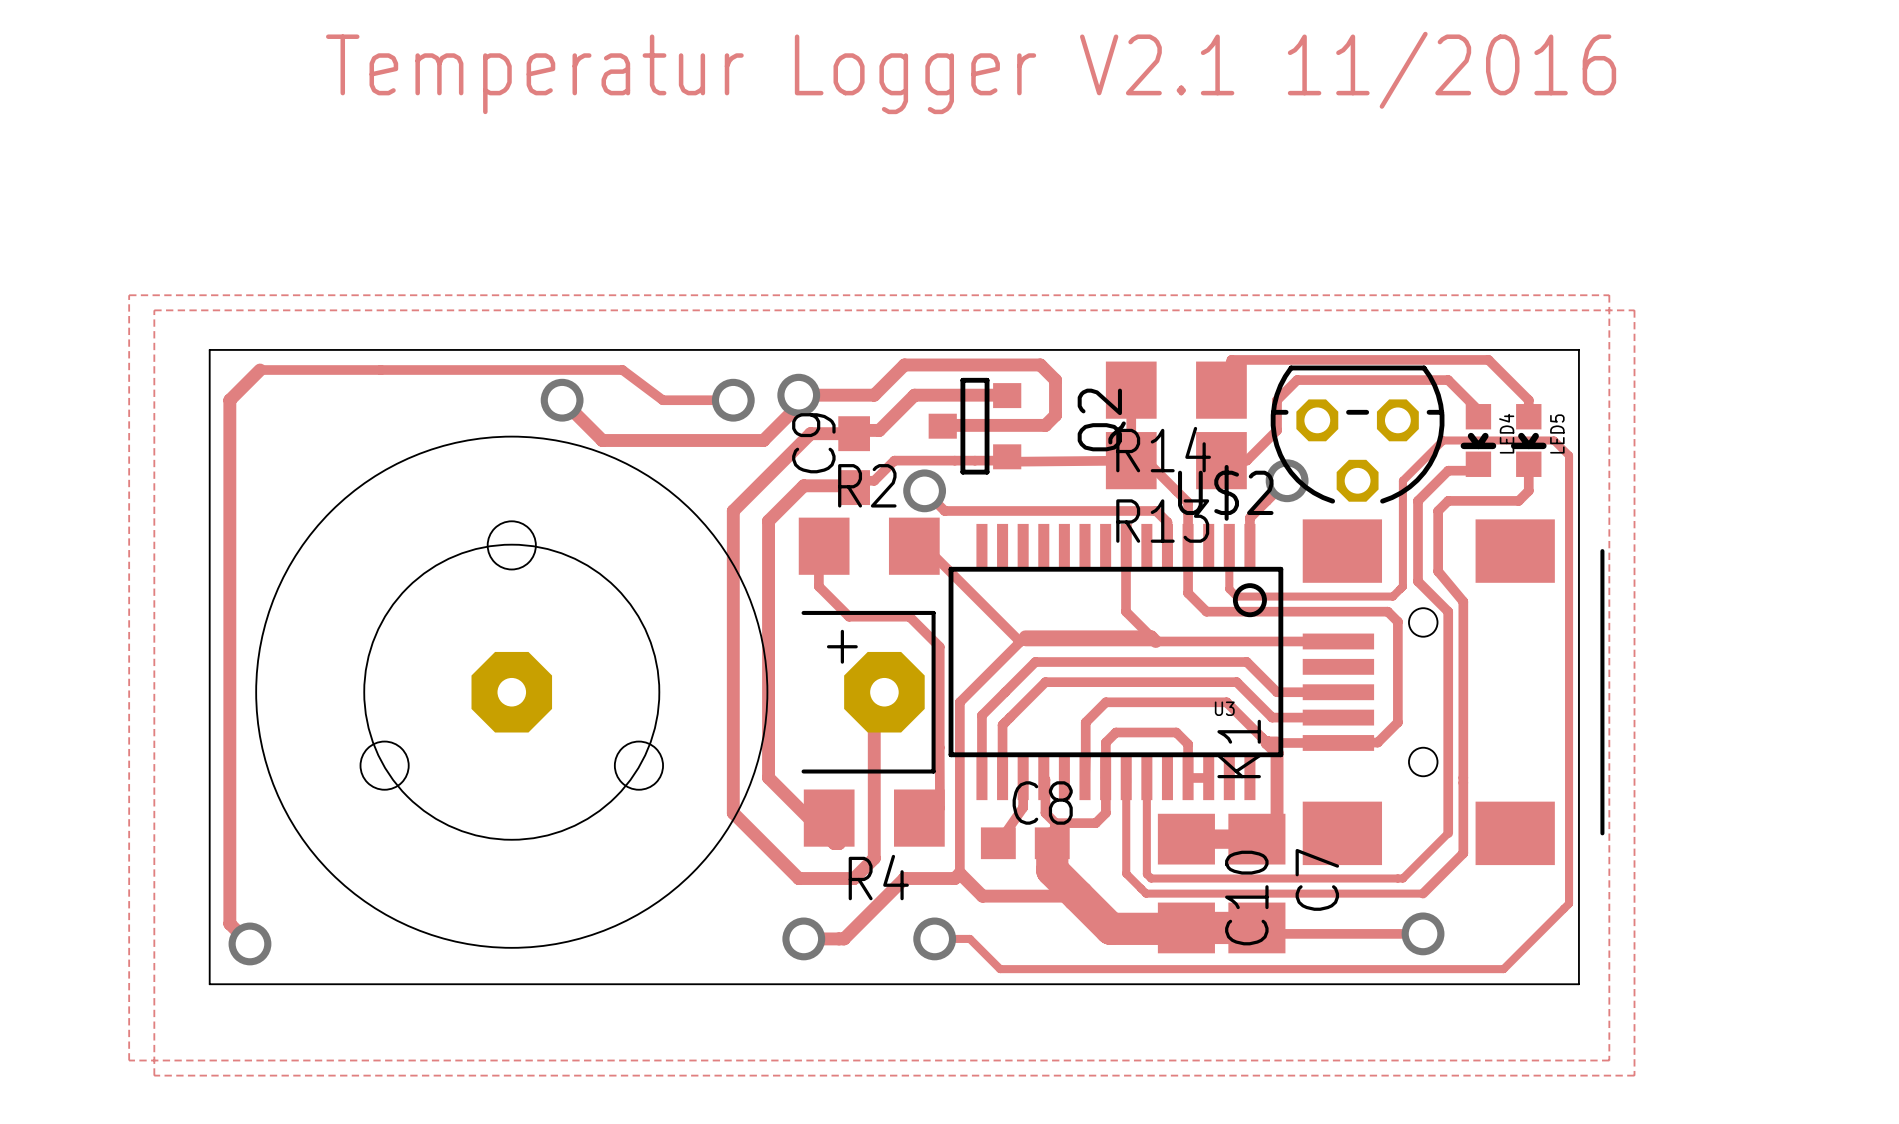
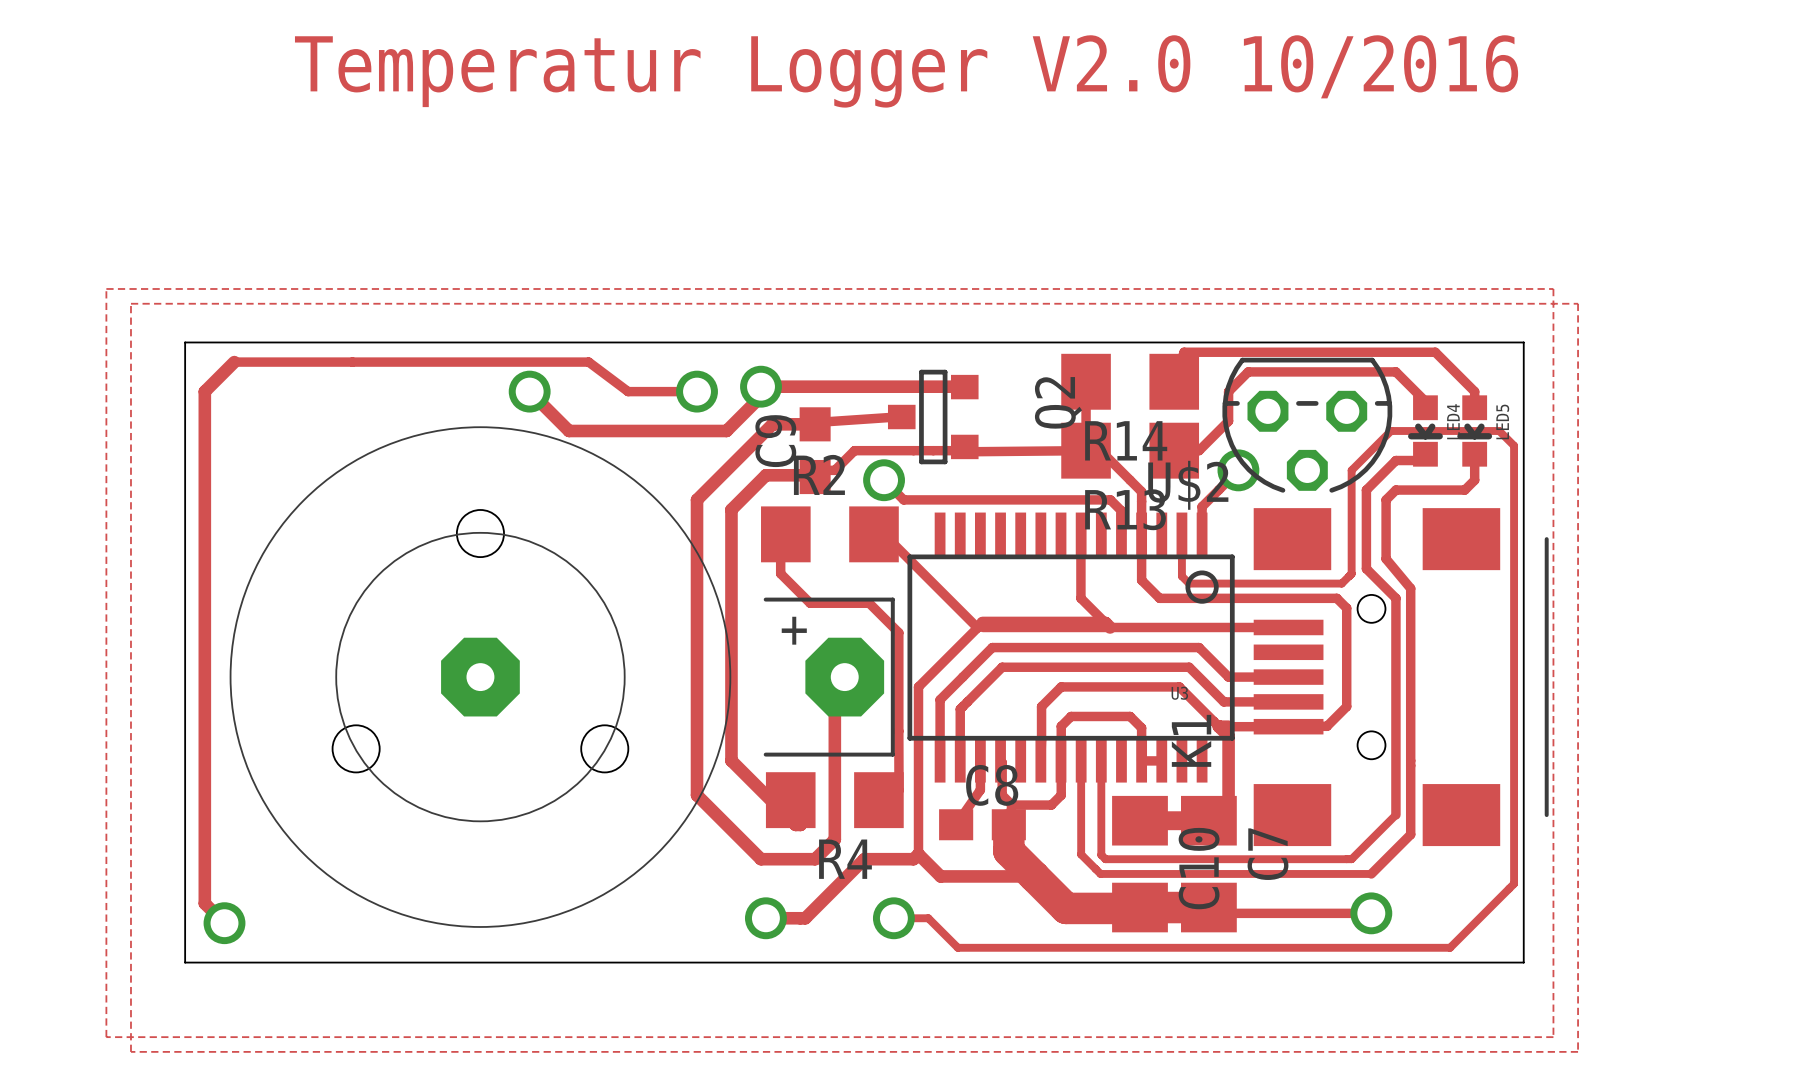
text: Temperatur Logger V2.1 11/2016 (971, 72) -> Temperatur Logger V2.0 10/2016 (906, 71)
track: (874, 395) (904, 364) (1040, 364) (1055, 380) (1055, 415) (1045, 425) (942, 426) -> none
track: (914, 395) (879, 430) (864, 430) -> (874, 386) (834, 386)
track: none -> (896, 417) (824, 421)

